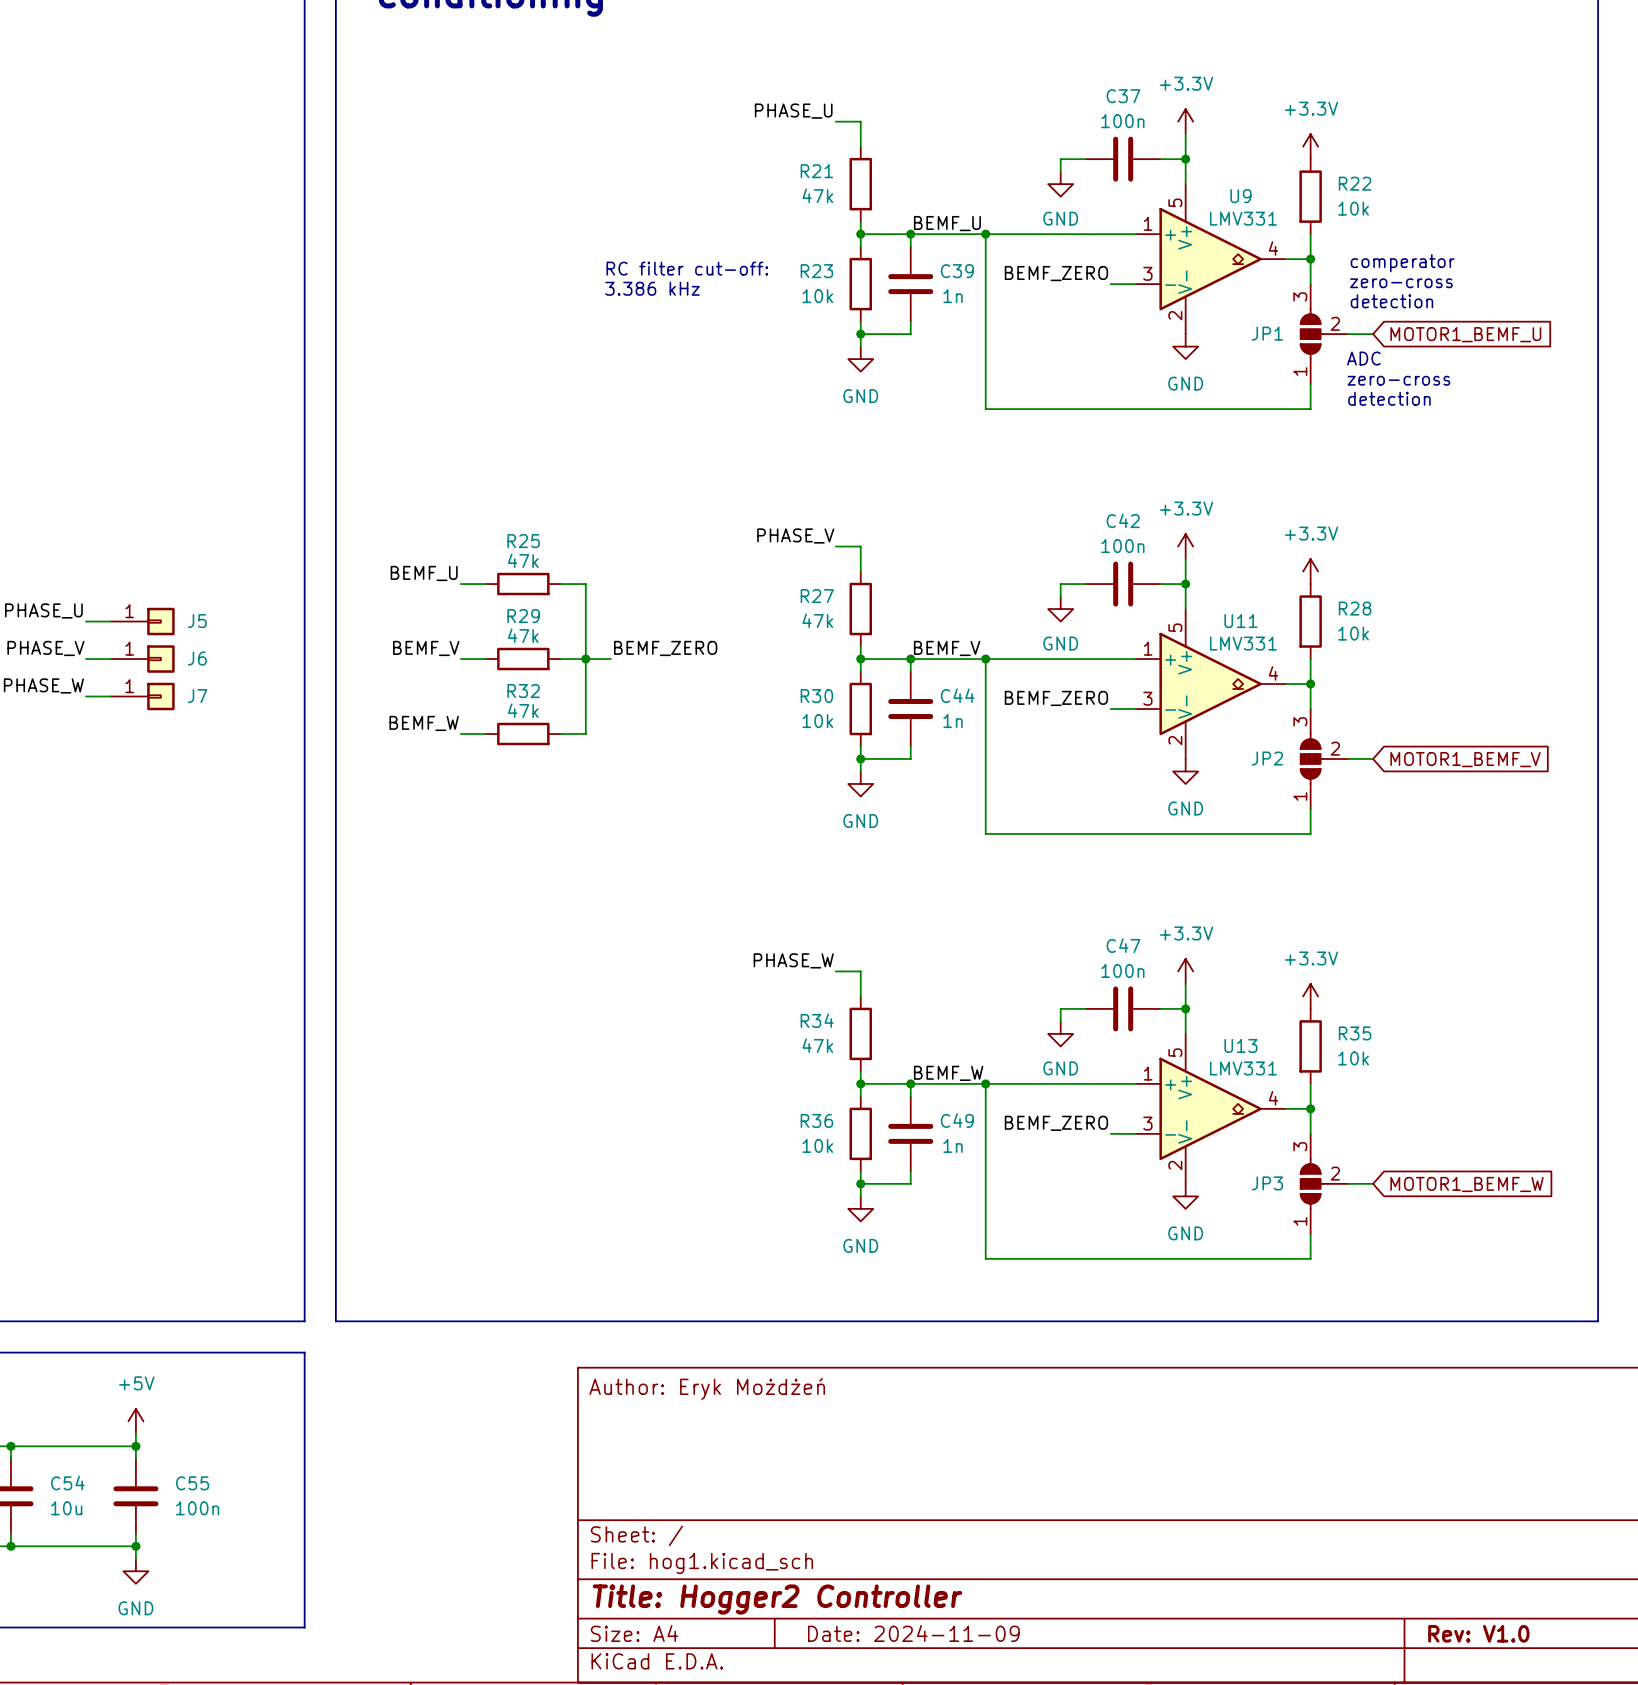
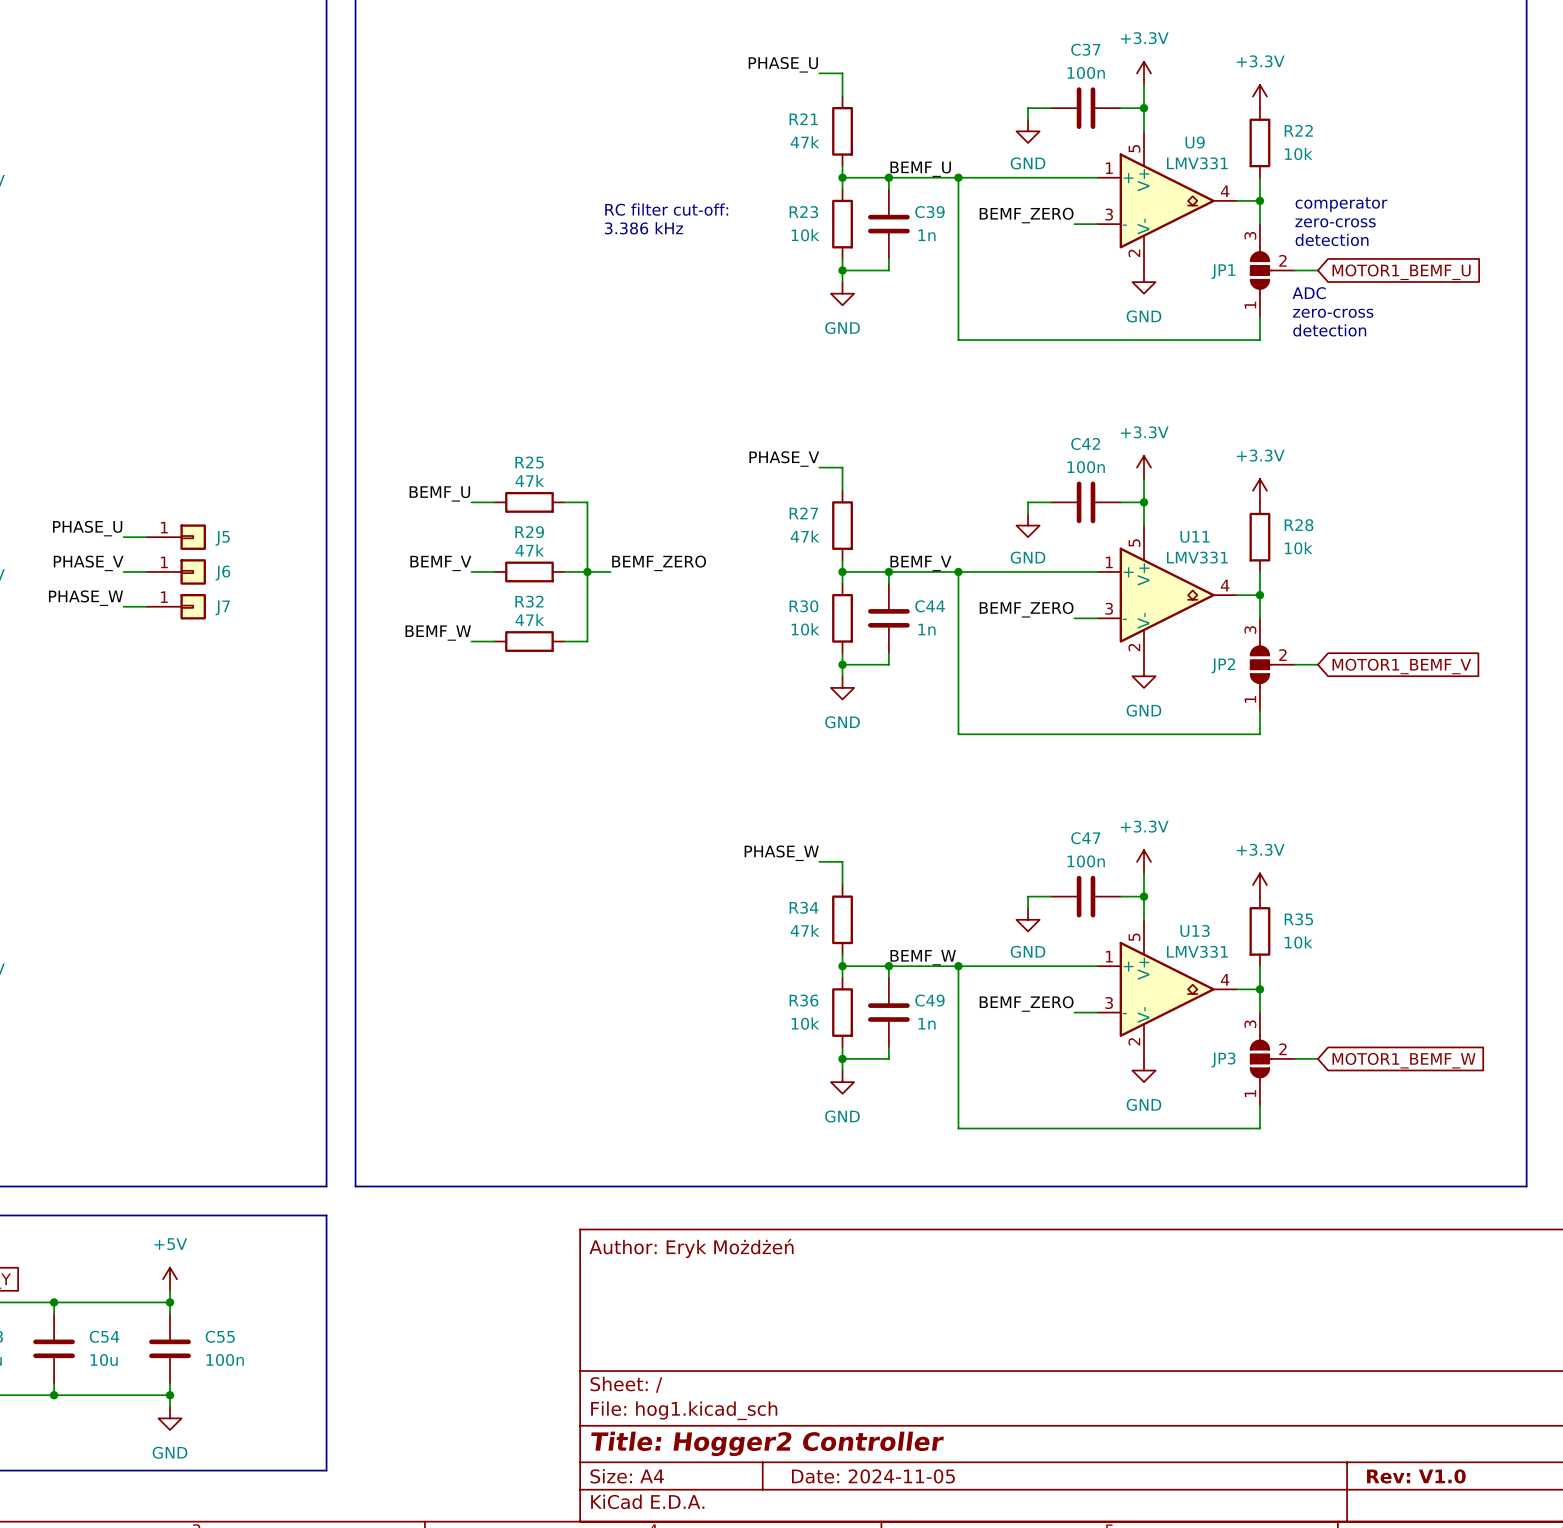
title block: Date: 2024-11-09 (913, 1633) -> Date: 2024-11-05 (873, 1476)

